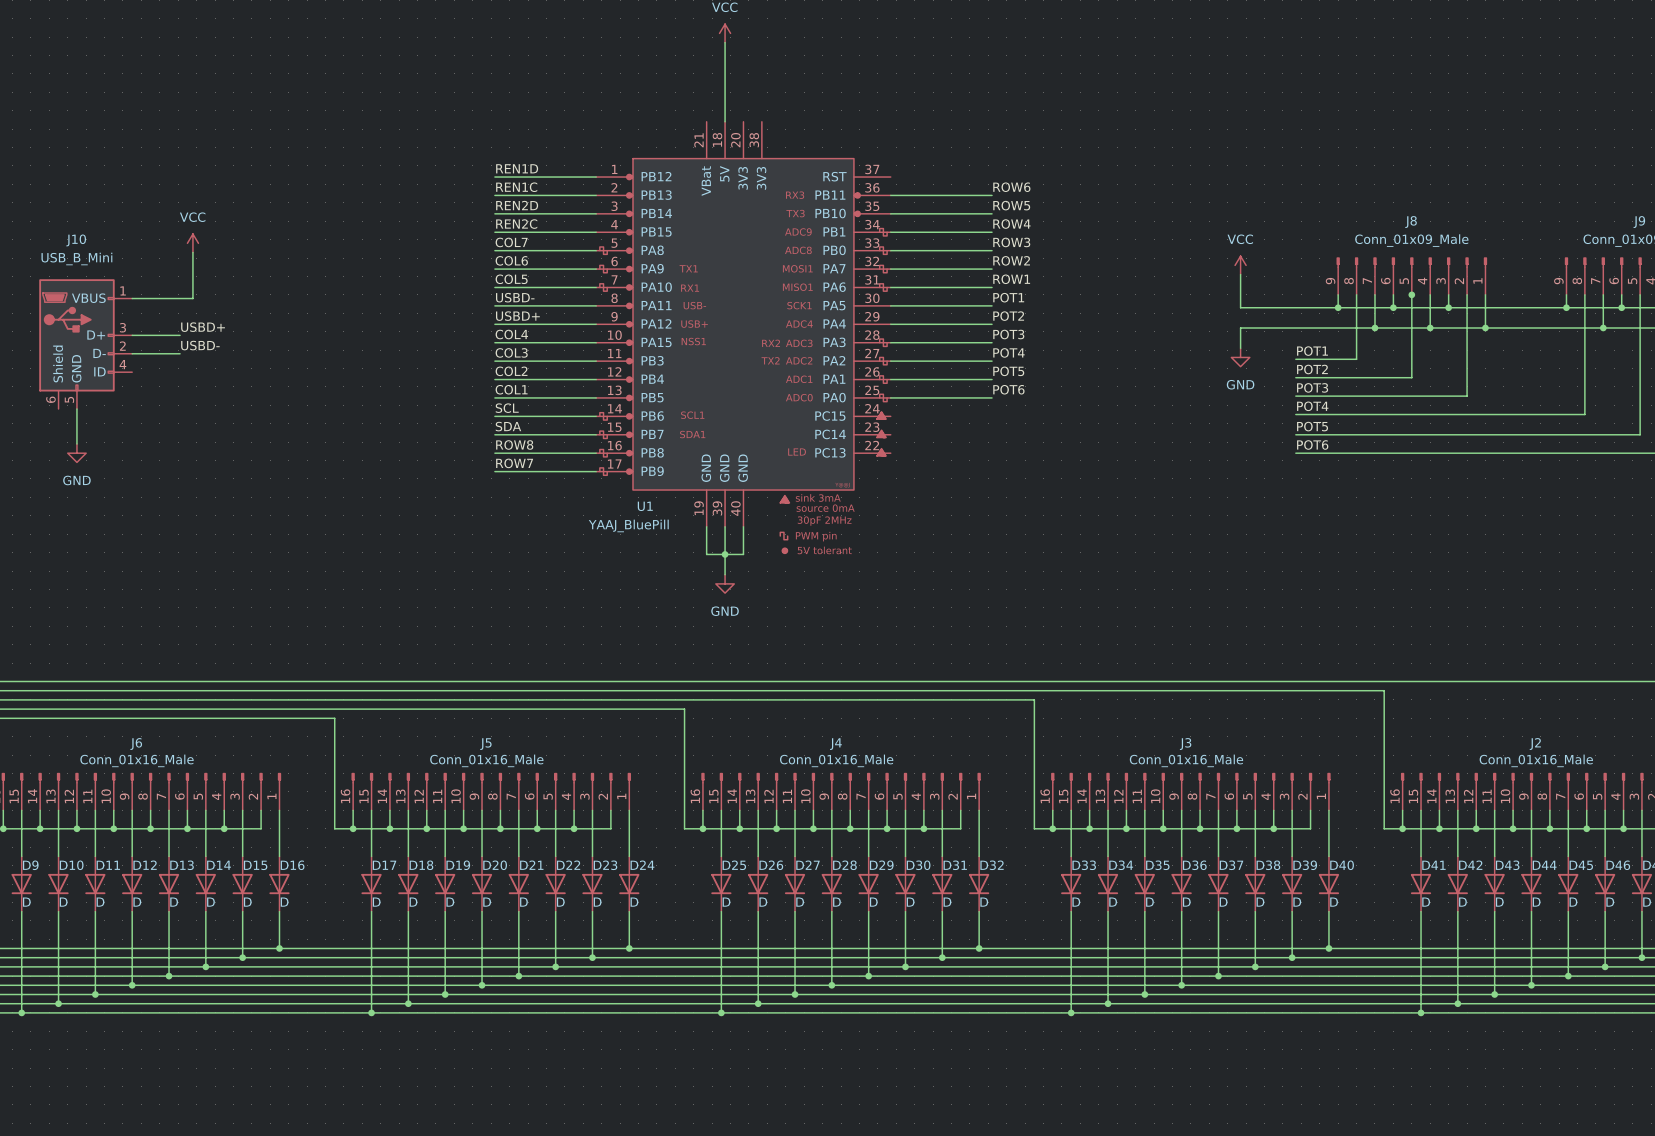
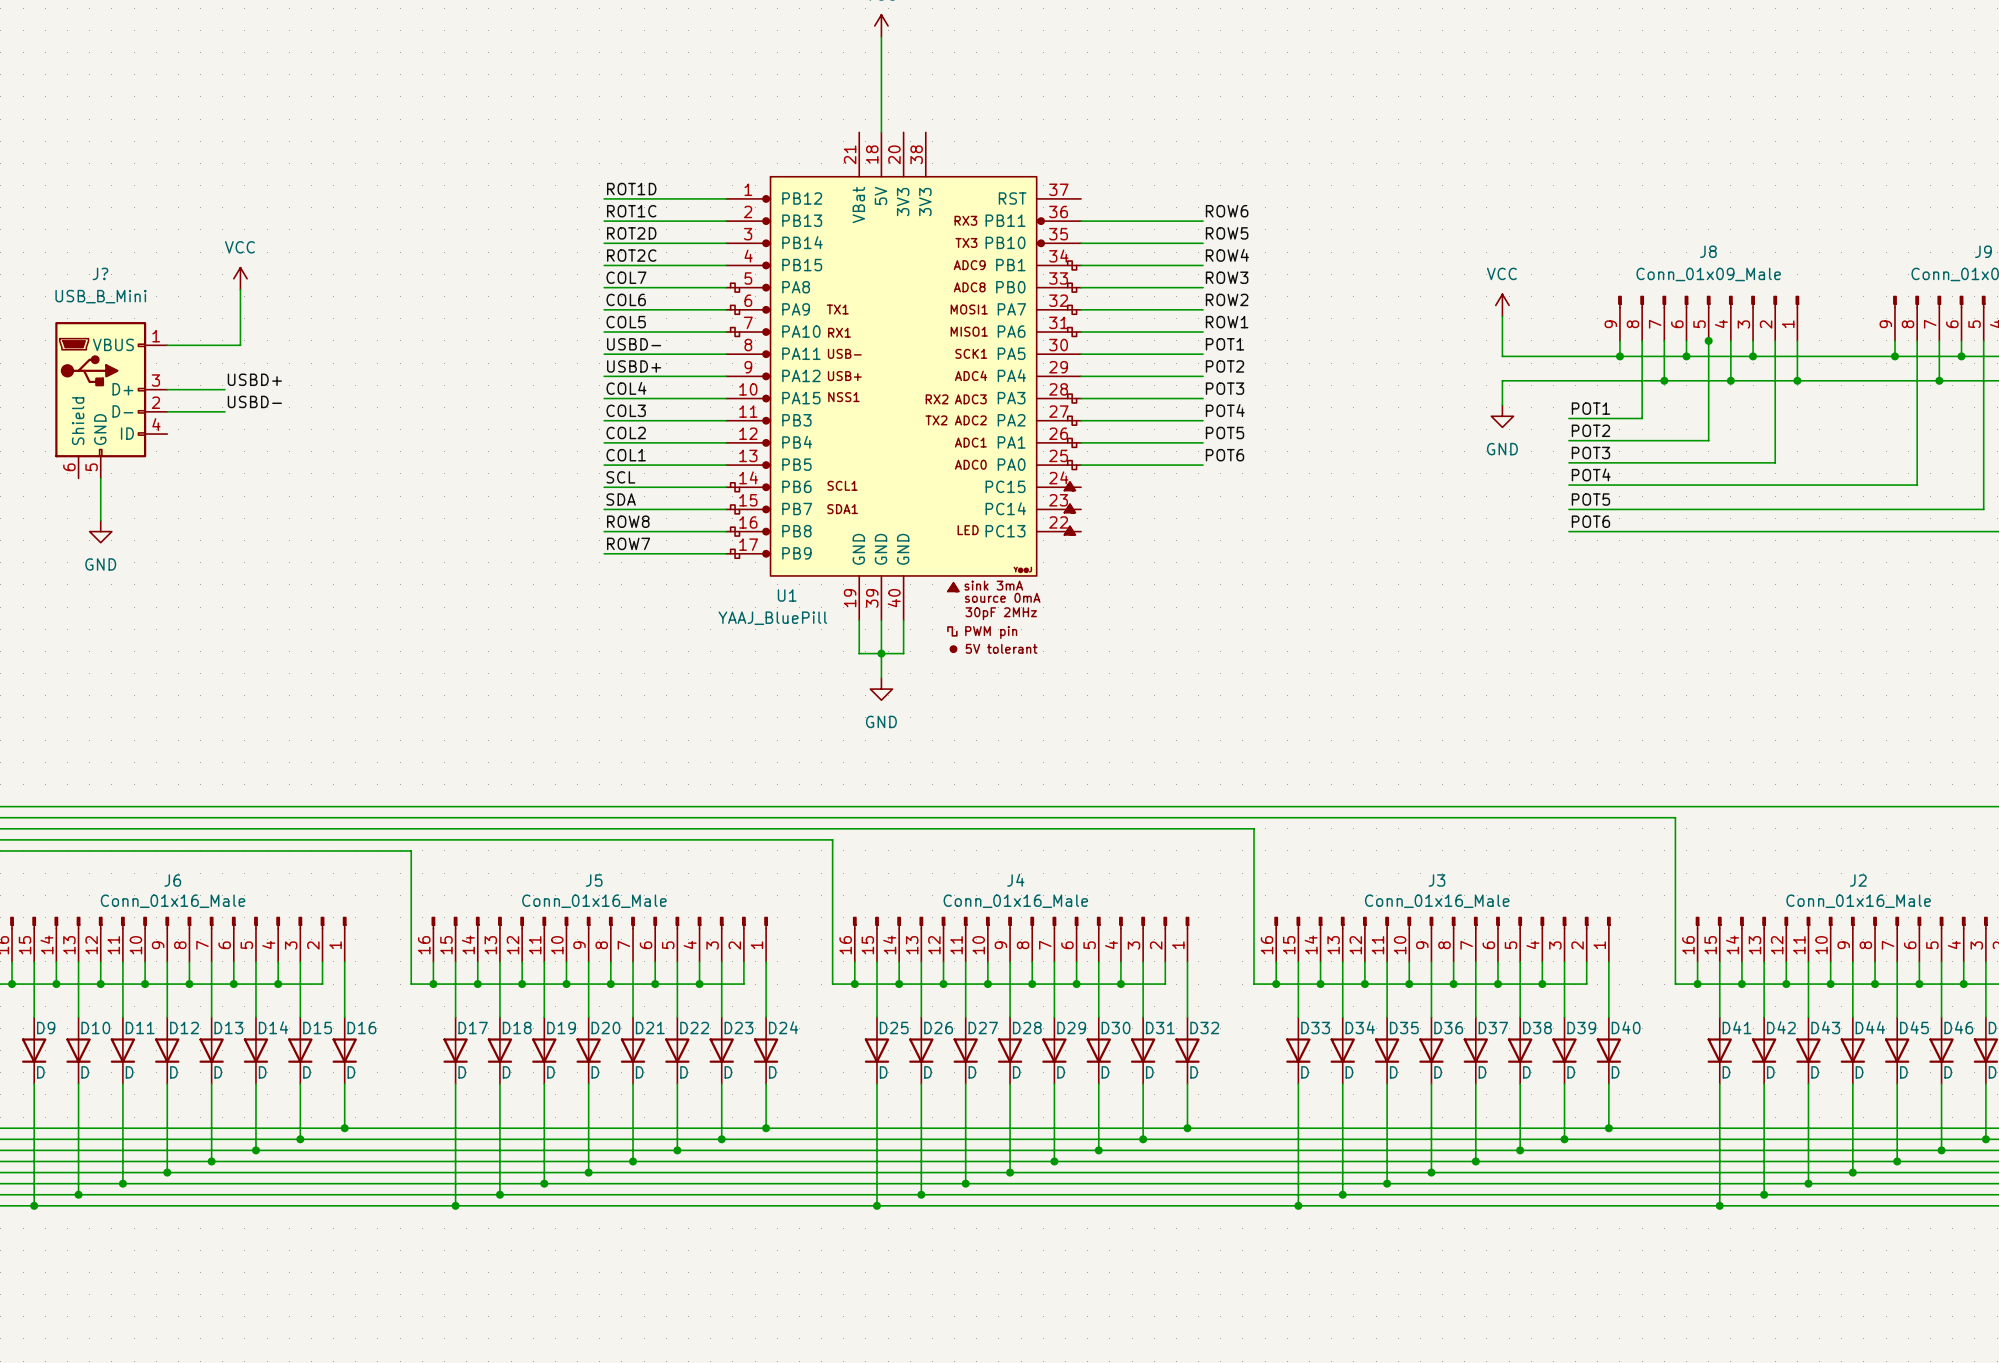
label: REN1D (517, 168) -> ROT1D (631, 189)
label: REN1C (516, 187) -> ROT1C (631, 211)
label: REN2D (517, 205) -> ROT2D (631, 233)
label: REN2C (516, 224) -> ROT2C (631, 255)
J10 name: J10 (76, 240) -> J? (100, 273)

